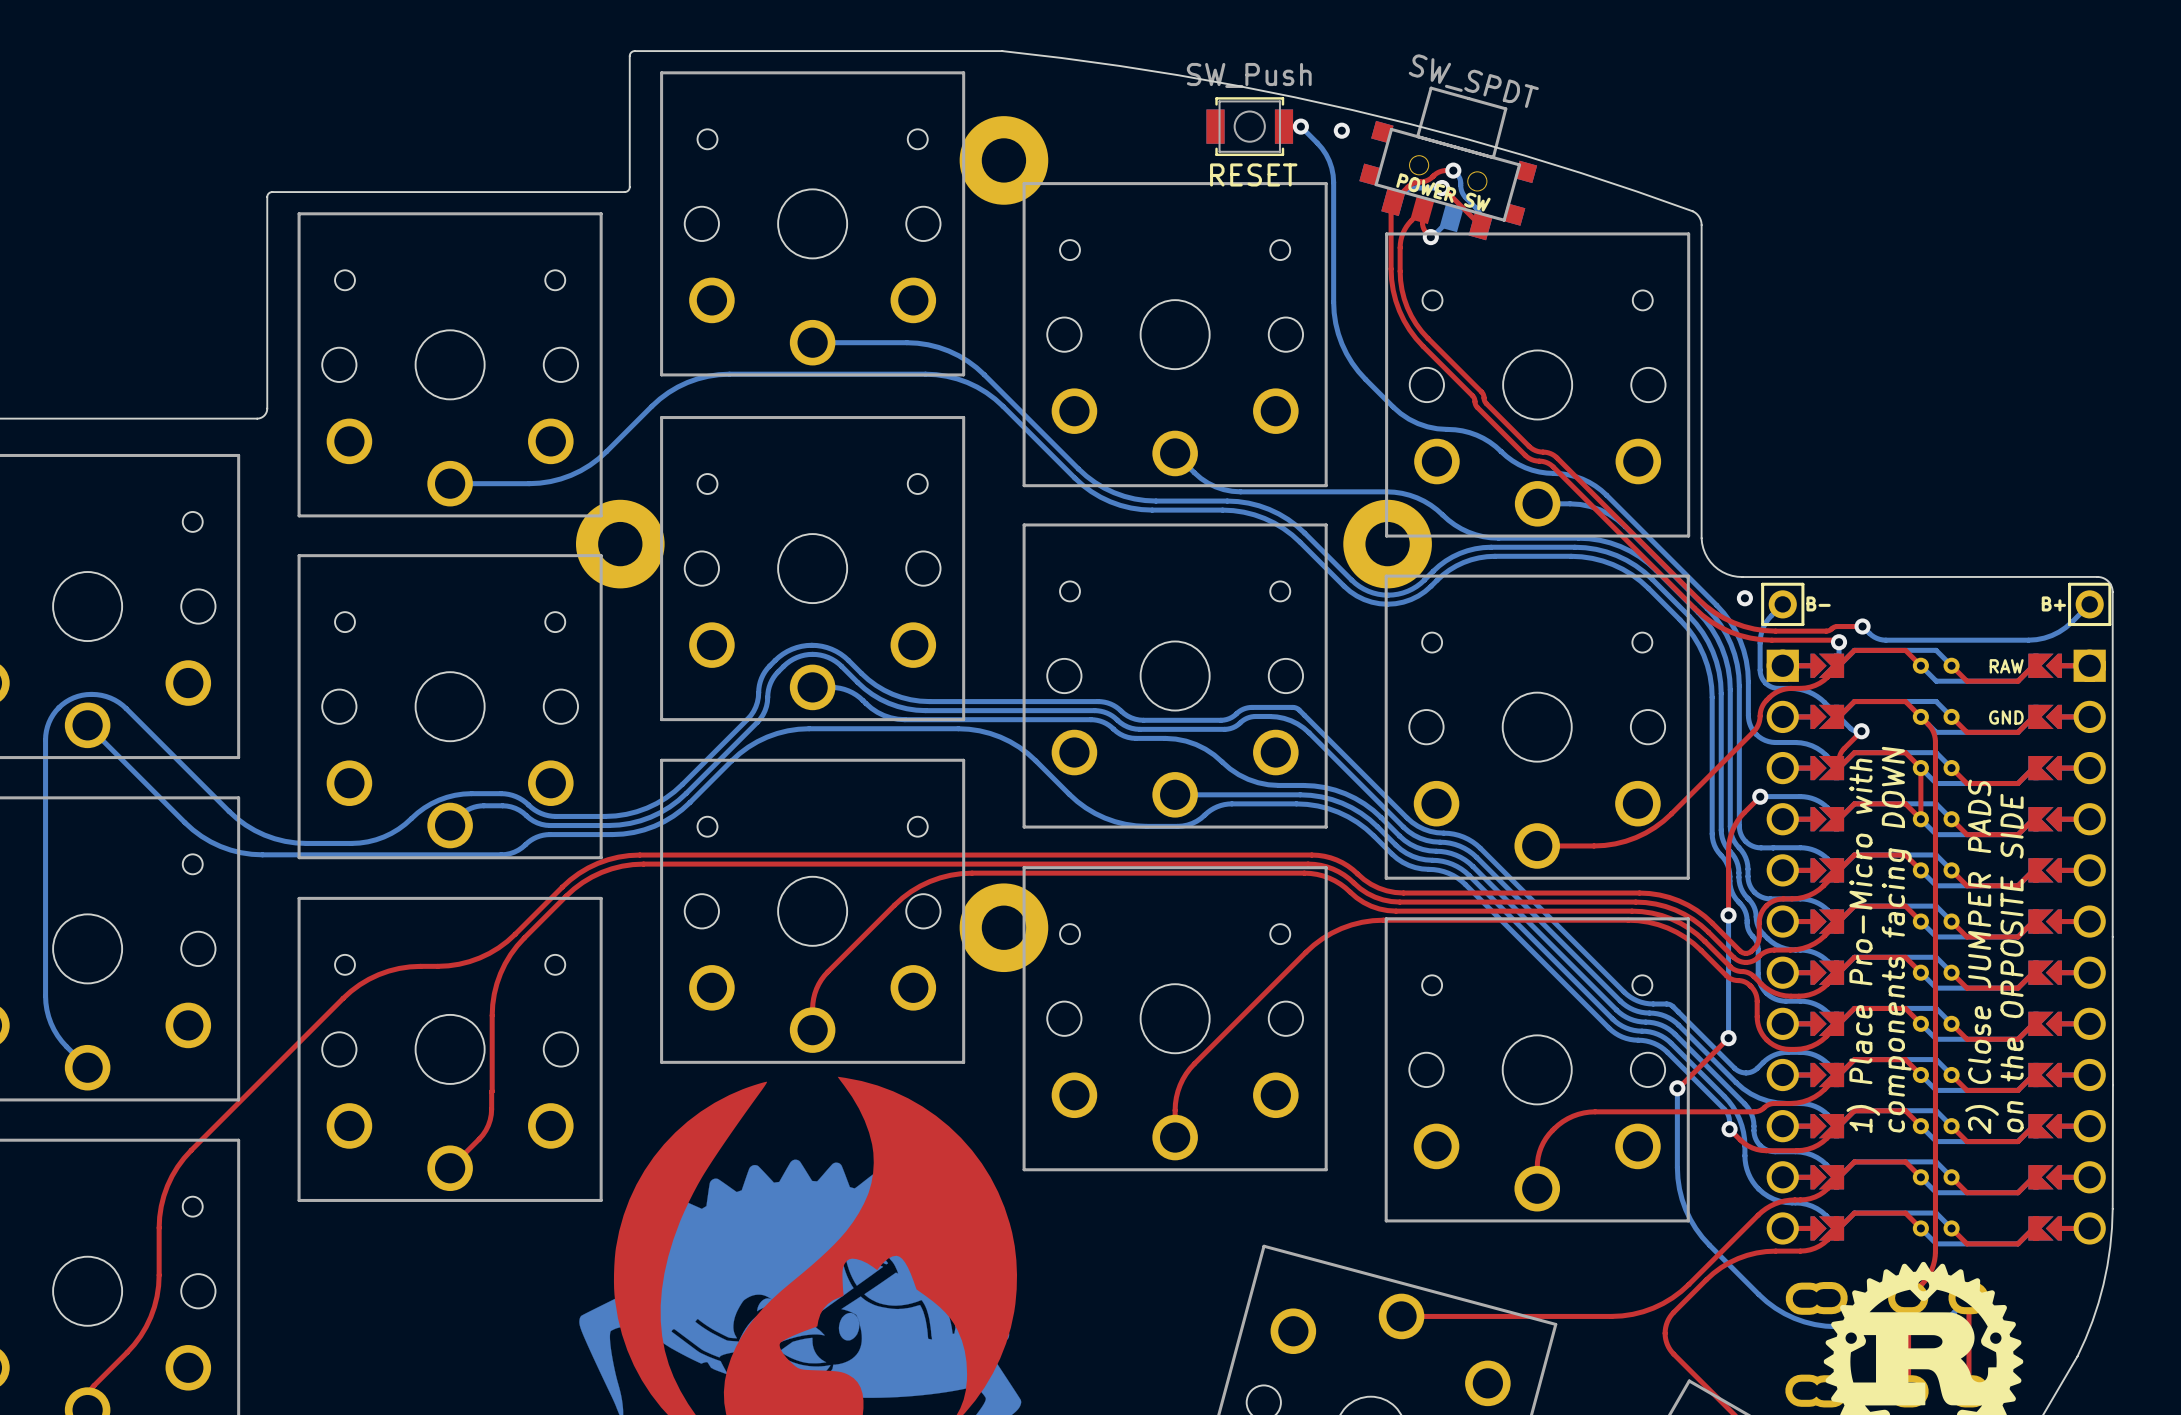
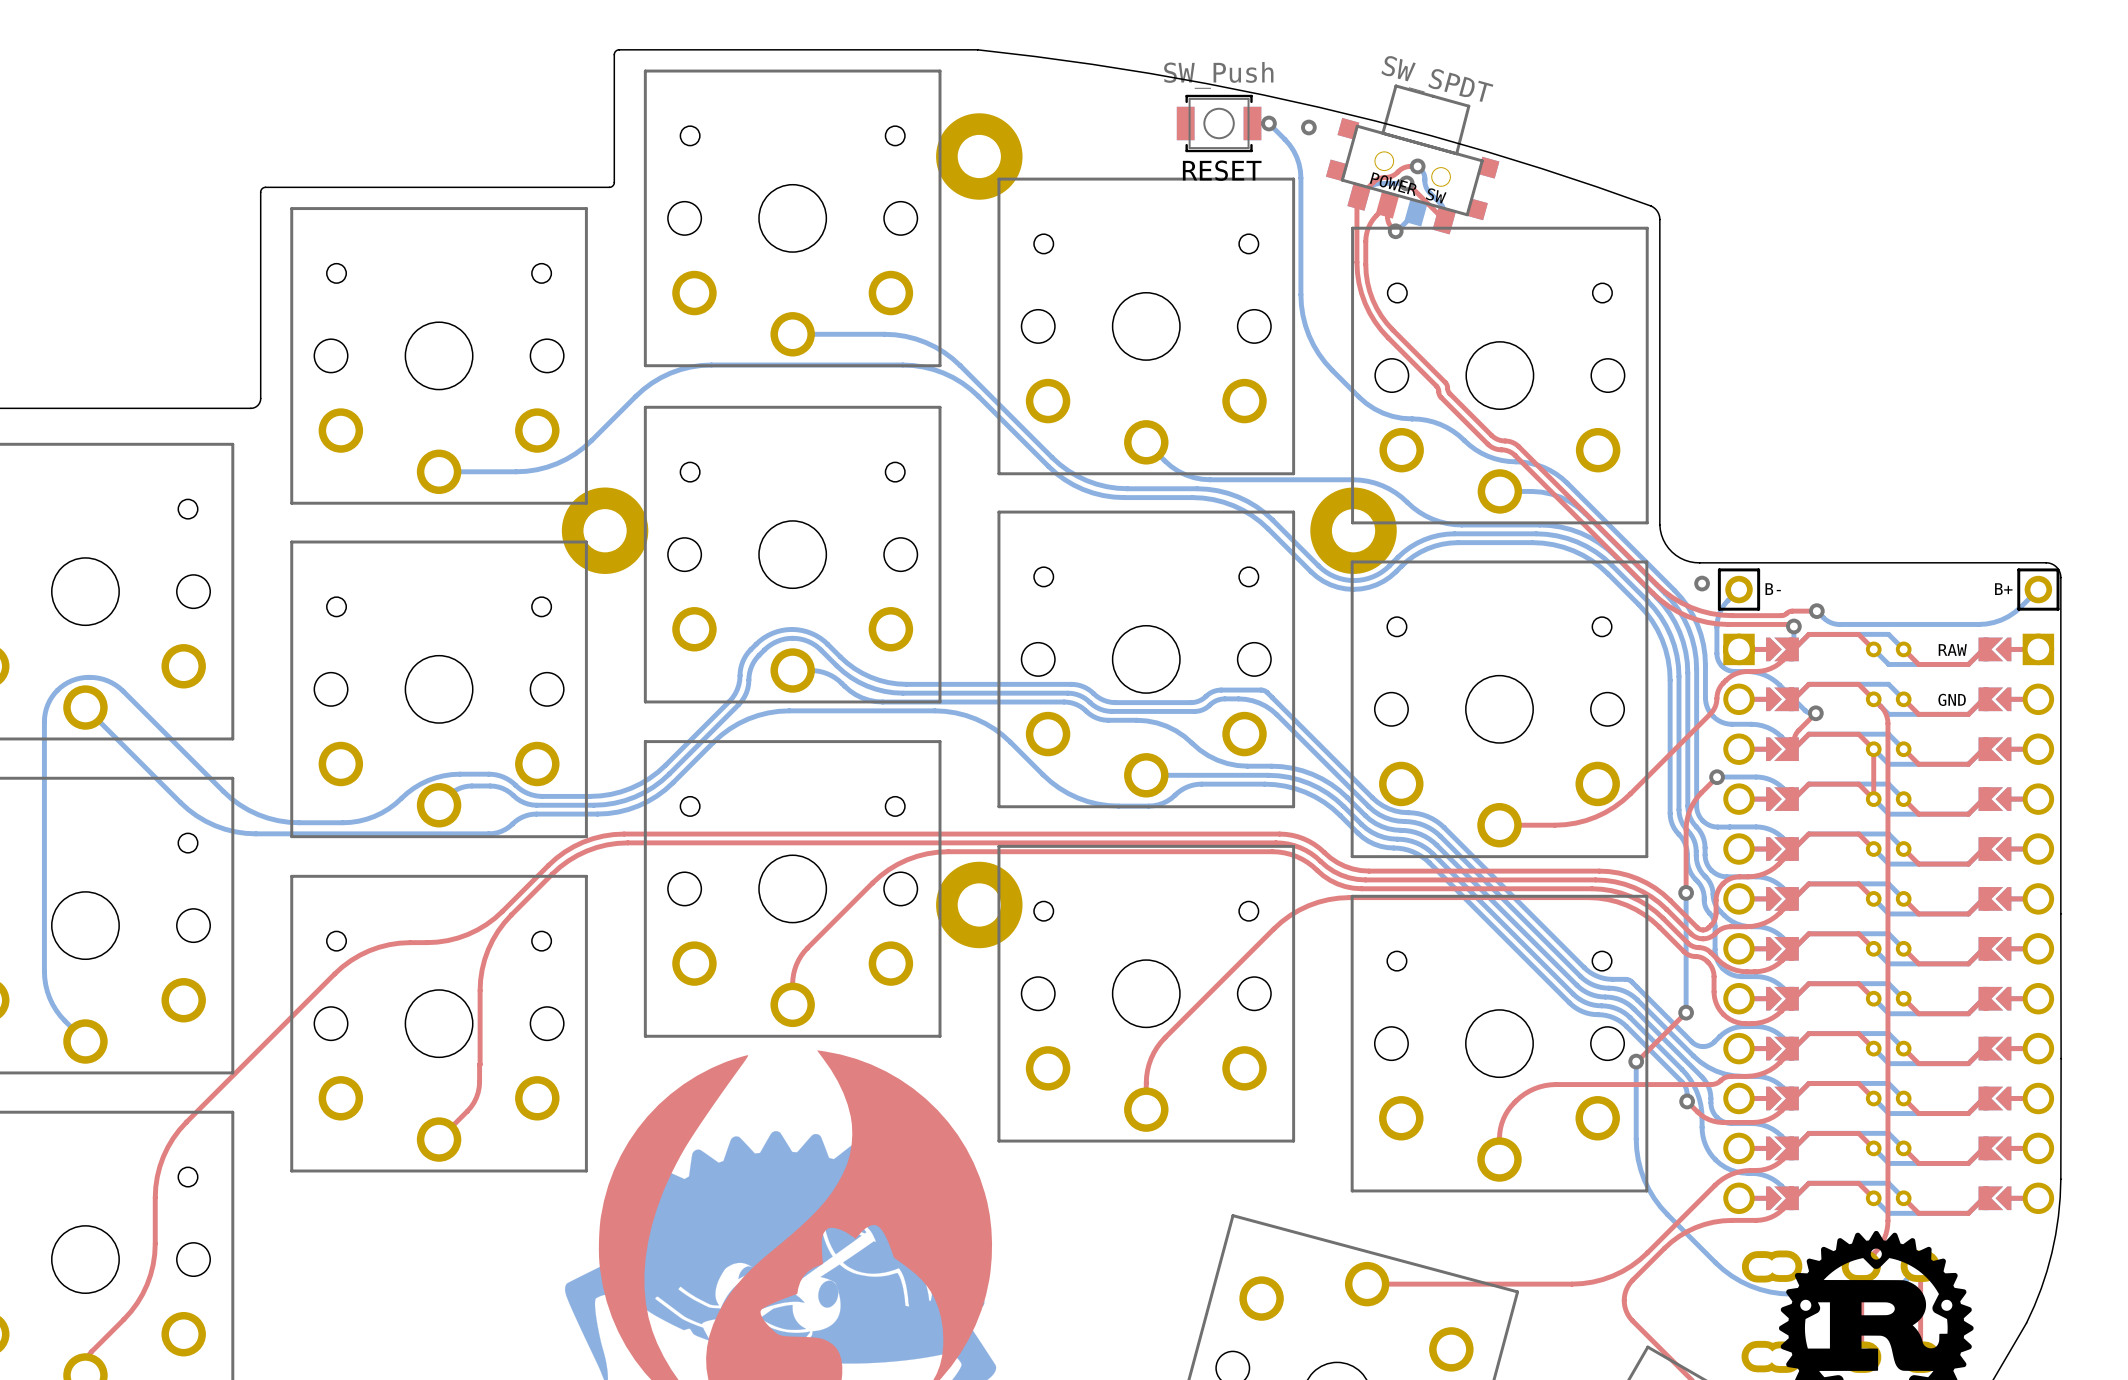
text: components facing DOWN (1896, 939) -> none
text: 1) Place Pro-Micro with (1863, 945) -> none
text: 2) Close JUMPER PADS (1982, 956) -> none
text: on the OPPOSITE SIDE (2012, 963) -> none

